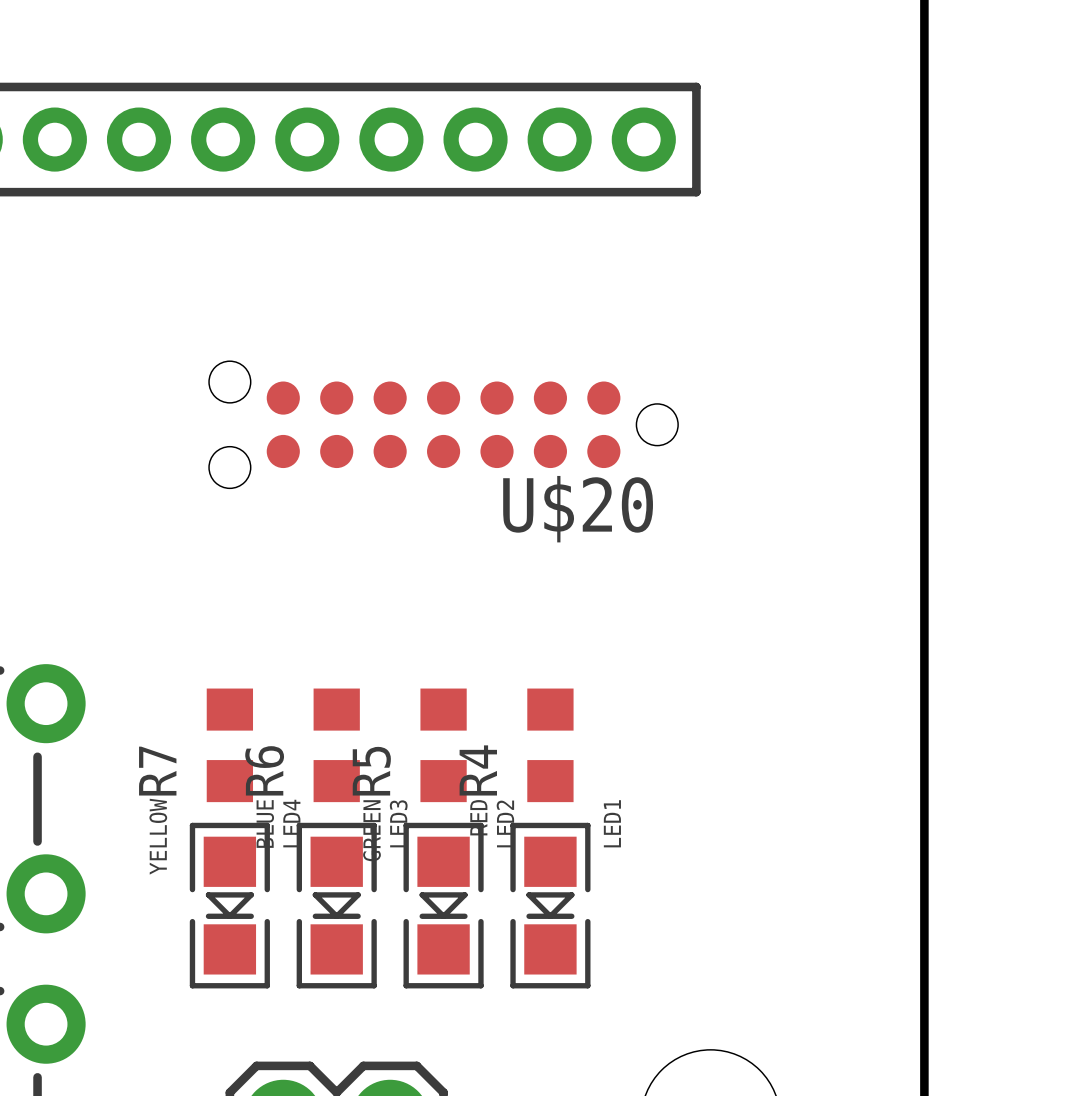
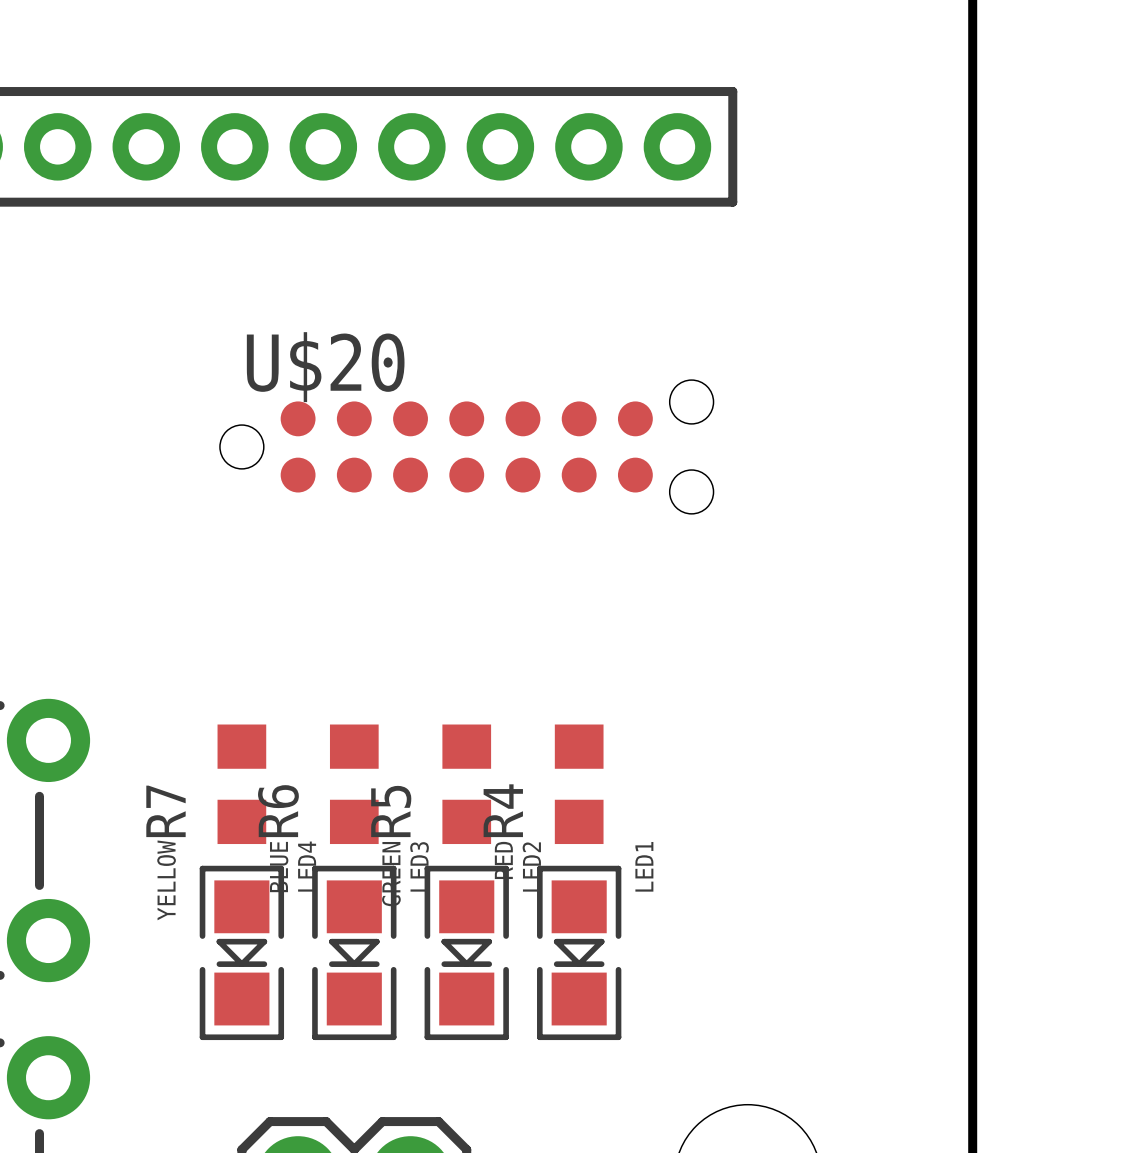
U$20 rotation: 0° (443, 424) -> 180° (466, 446)

